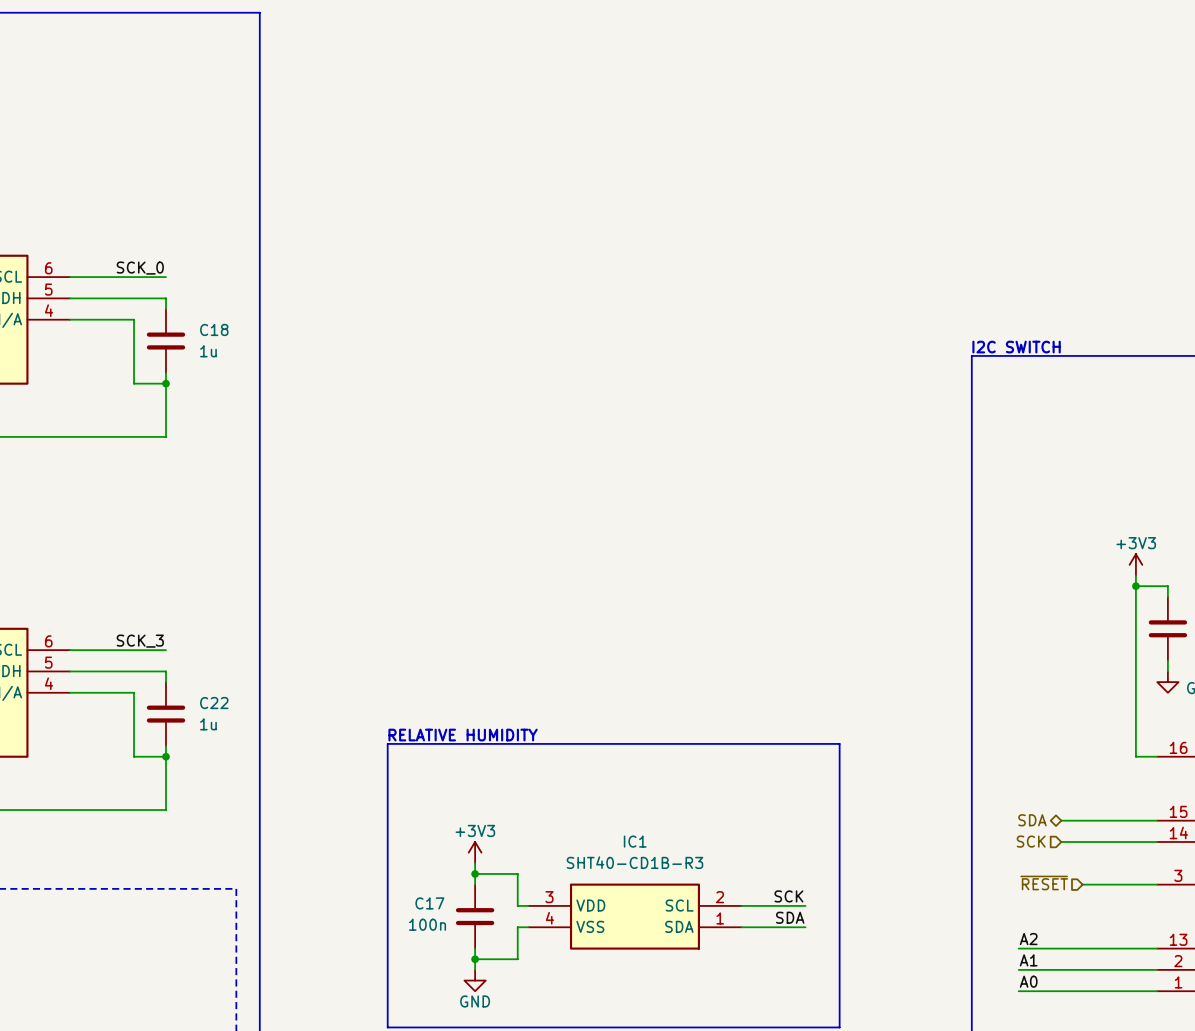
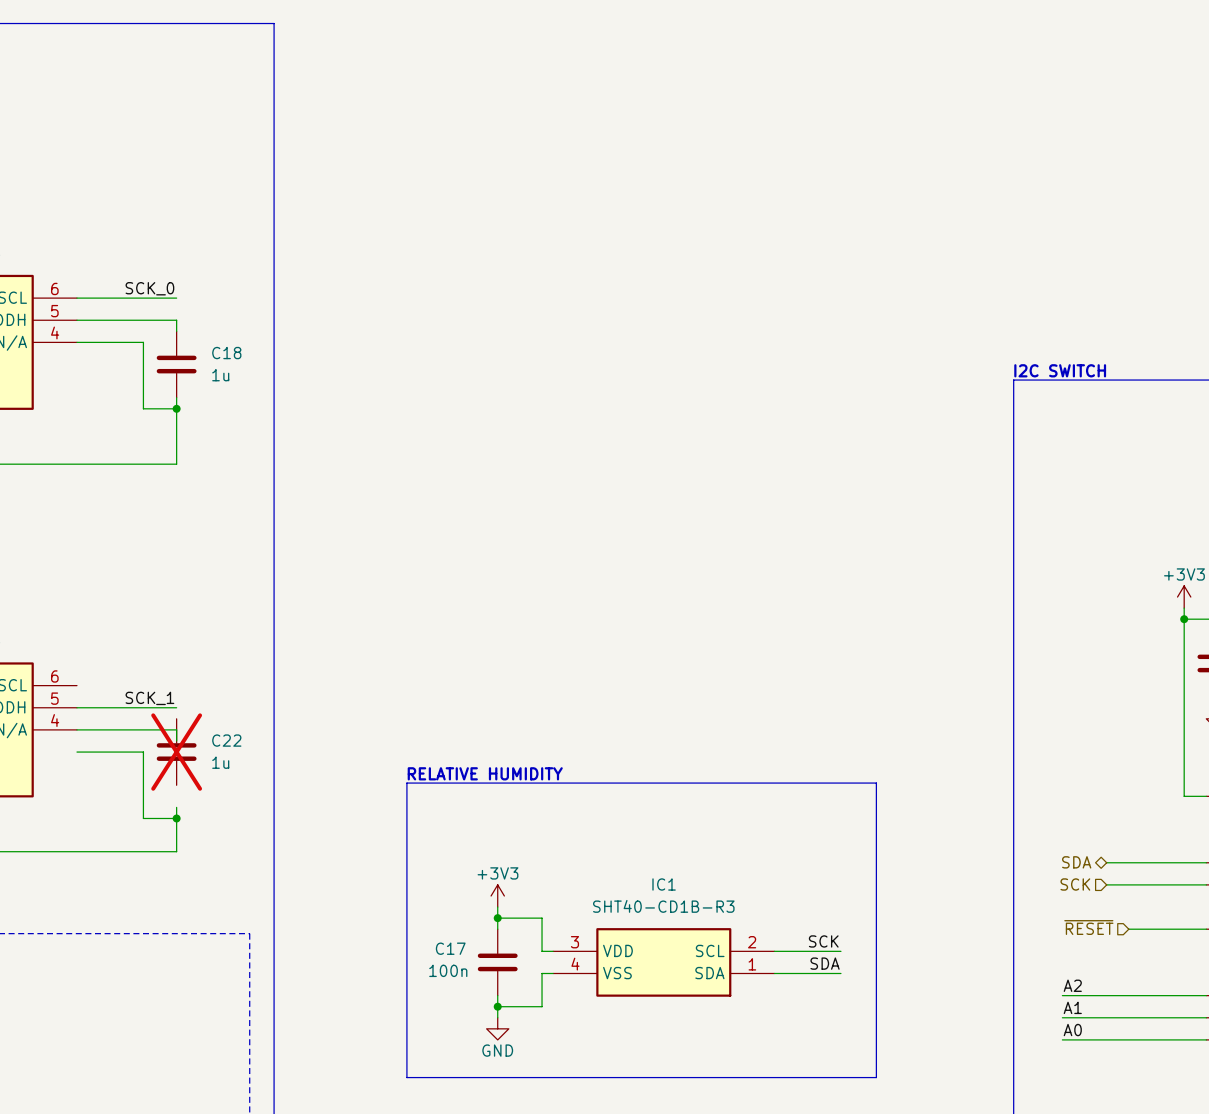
label: SCK_3 (140, 641) -> SCK_1 (149, 698)
wire: (70, 650) (165, 650) -> none
wire: (165, 671) (165, 682) -> none
wire: (134, 692) (134, 714) -> (143, 729) (176, 729) (176, 740)
wire: none -> (76, 752) (143, 752)
C22 do-not-place cross: none -> (176, 752)
wire: (165, 746) (165, 767) -> none
wire: (134, 756) (165, 756) -> (143, 796) (143, 818) (176, 818)
junction position: (165, 756) -> (176, 818)

